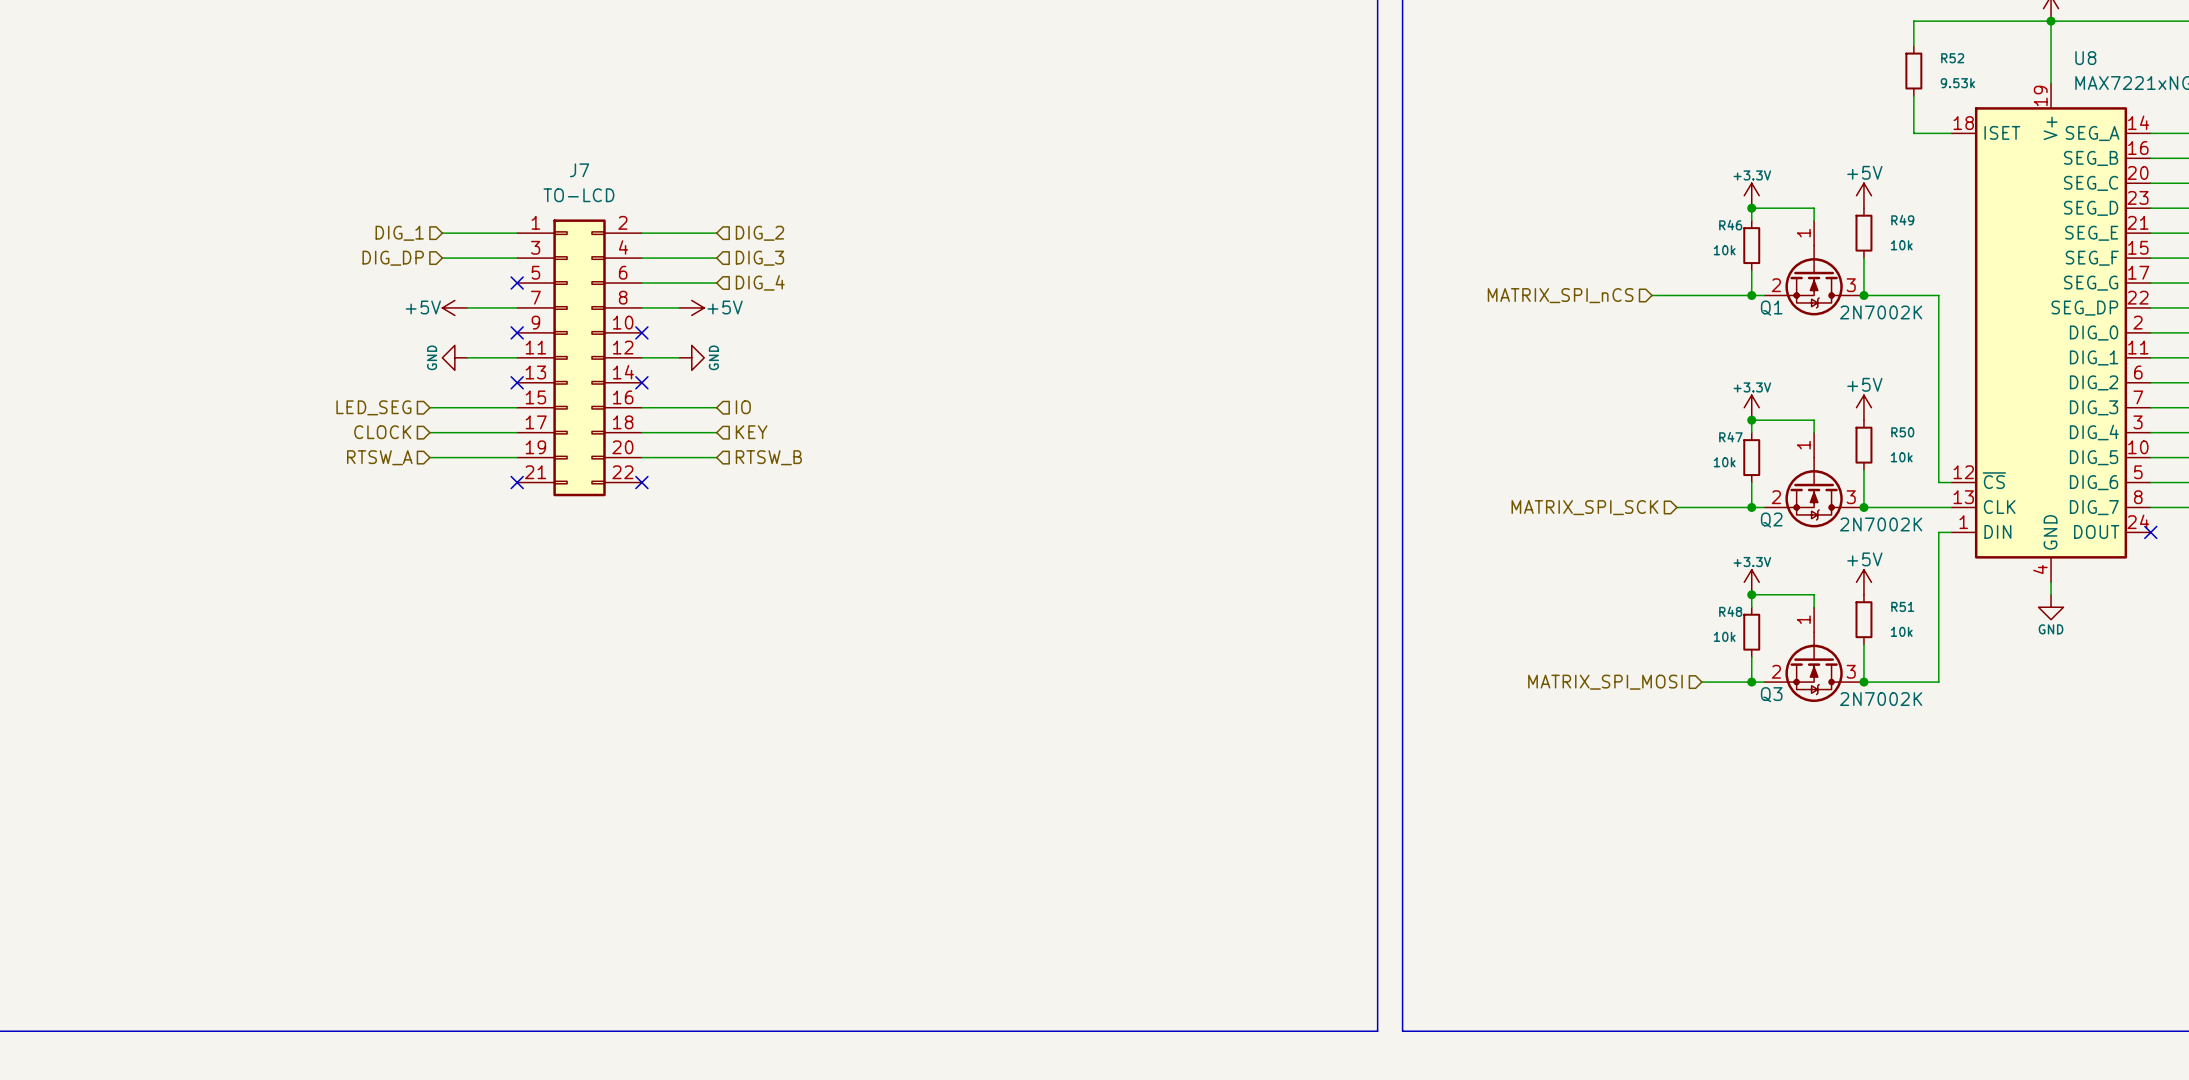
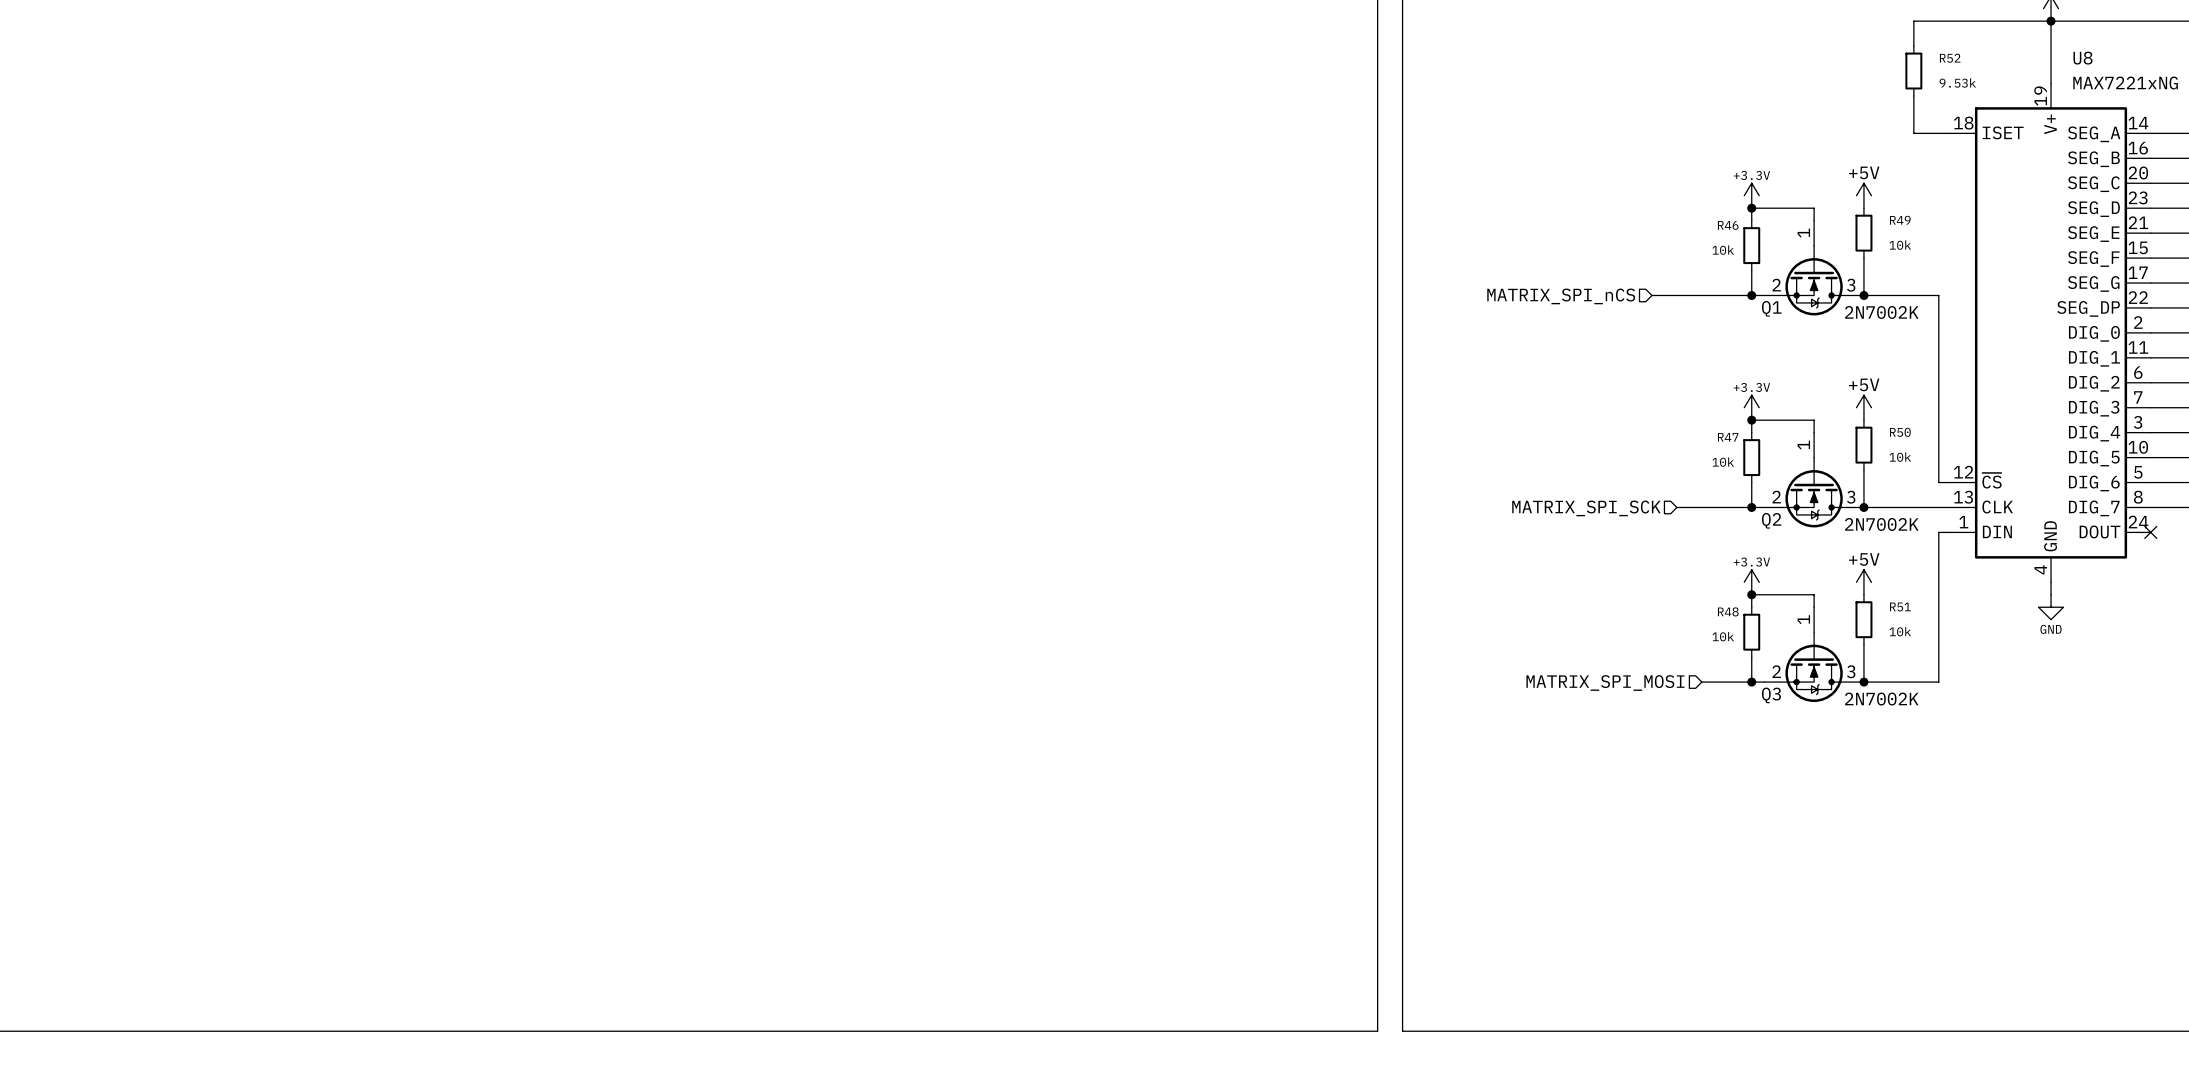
hierarchical label: DIG_1 (399, 233) -> none
wire: (442, 233) (517, 233) -> none
wire: (641, 233) (716, 233) -> none
hierarchical label: DIG_2 (759, 233) -> none
hierarchical label: DIG_DP (393, 258) -> none
wire: (442, 258) (517, 258) -> none
wire: (641, 258) (716, 258) -> none
hierarchical label: DIG_3 (759, 258) -> none
hierarchical label: DIG_4 (760, 282) -> none
no-connect mark: (517, 283) -> none
wire: (641, 283) (716, 283) -> none
power symbol: +5V (454, 307) -> none
wire: (467, 307) (517, 307) -> none
wire: (641, 307) (679, 307) -> none
power symbol: +5V (691, 307) -> none
no-connect mark: (517, 332) -> none
no-connect mark: (641, 332) -> none
power symbol: GND (454, 357) -> none
wire: (467, 357) (517, 357) -> none
J7: TO-LCD (579, 357) -> none
wire: (641, 357) (679, 357) -> none
power symbol: GND (691, 357) -> none
no-connect mark: (517, 382) -> none
no-connect mark: (641, 382) -> none
hierarchical label: LED_SEG (373, 407) -> none
wire: (429, 407) (517, 407) -> none
wire: (641, 407) (716, 407) -> none
hierarchical label: IO (743, 407) -> none
hierarchical label: CLOCK (382, 432) -> none
wire: (429, 432) (517, 432) -> none
wire: (641, 432) (716, 432) -> none
hierarchical label: KEY (751, 432) -> none
hierarchical label: RTSW_A (379, 457) -> none
wire: (429, 457) (517, 457) -> none
wire: (641, 457) (716, 457) -> none
hierarchical label: RTSW_B (768, 457) -> none
no-connect mark: (517, 482) -> none
no-connect mark: (641, 482) -> none

